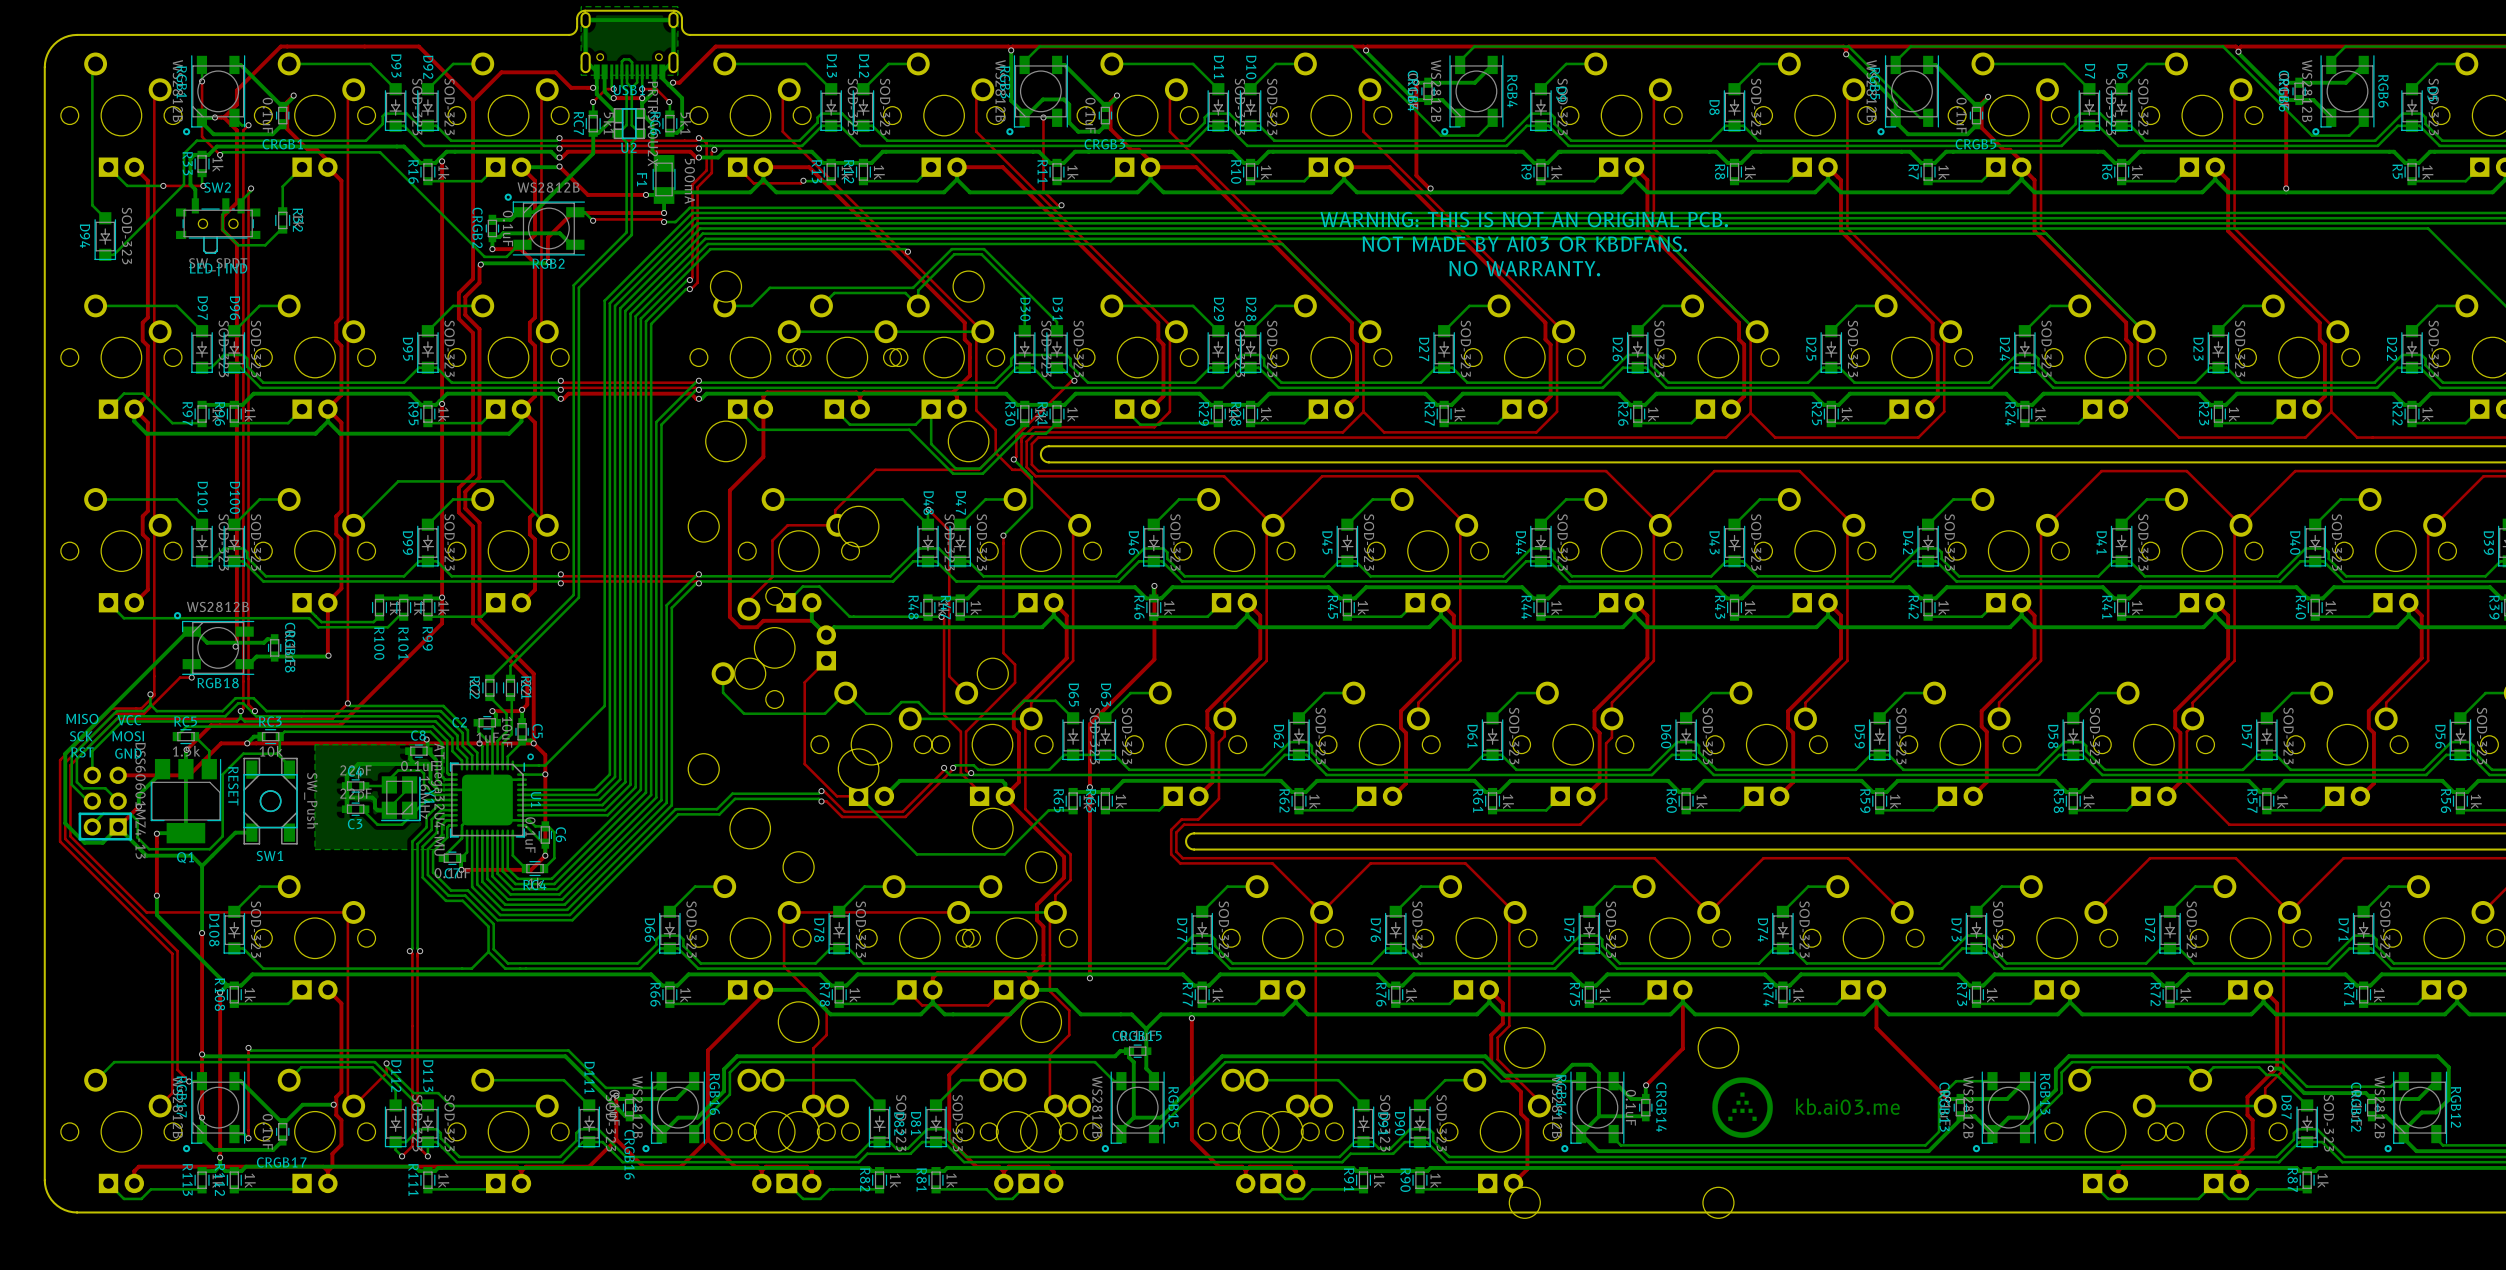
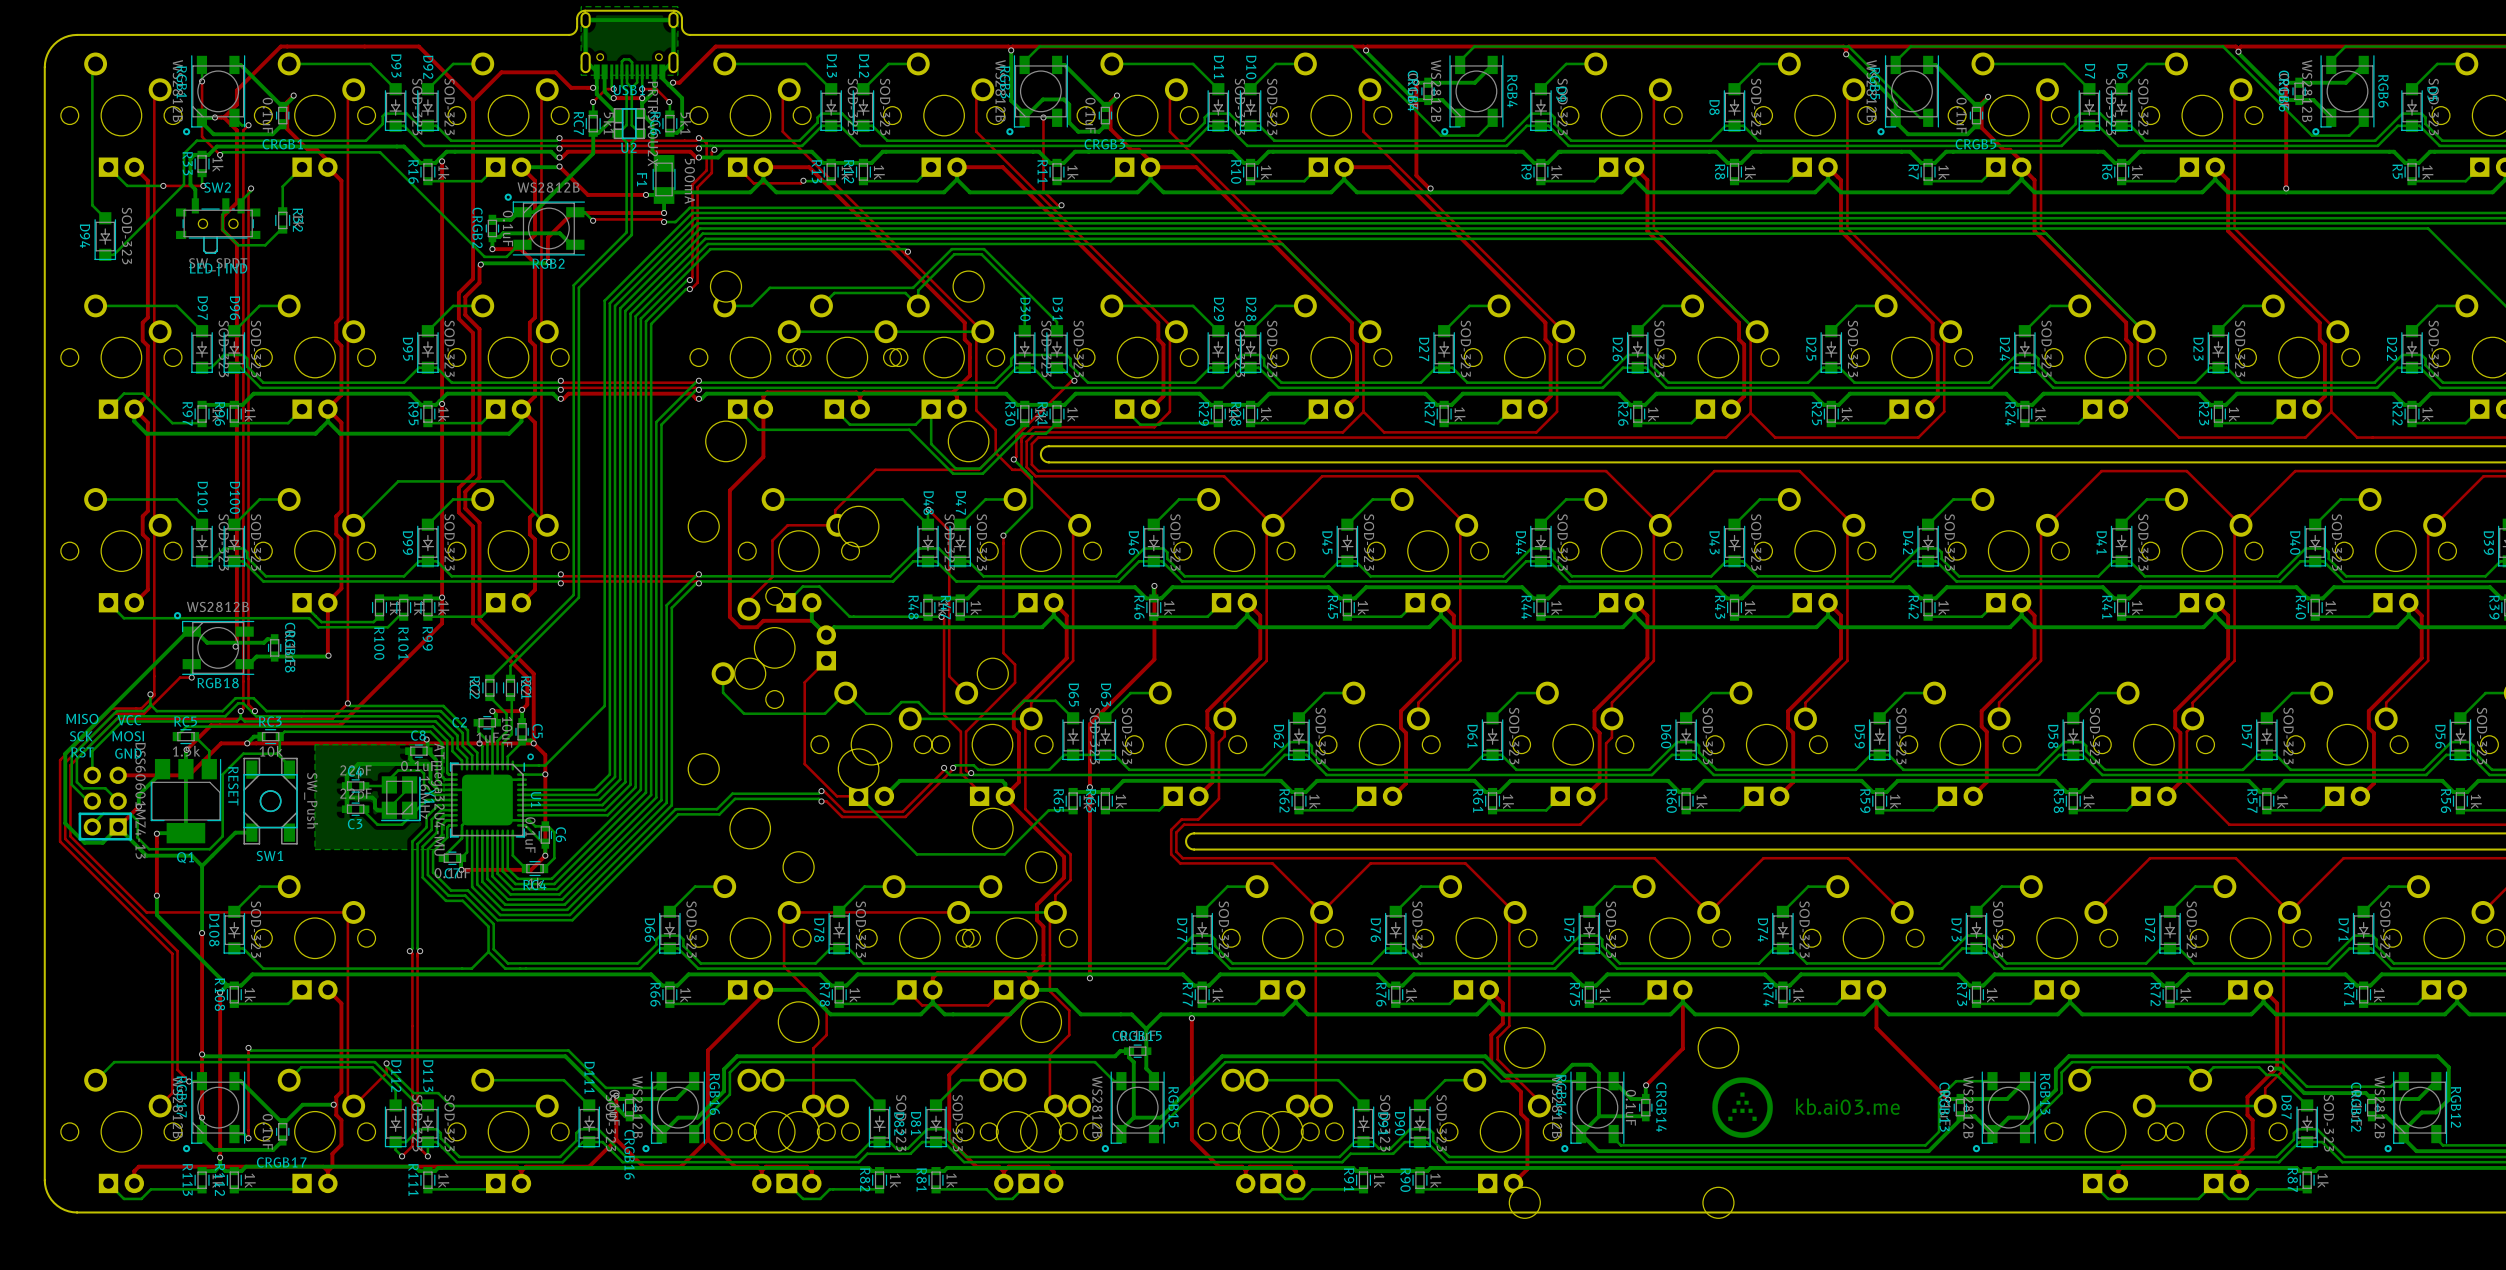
text: WARNING: THIS IS NOT AN ORIGINAL PCB. (1524, 219) -> none
text: NOT MADE BY AI03 OR KBDFANS. (1524, 244) -> none
text: NO WARRANTY. (1524, 268) -> none

